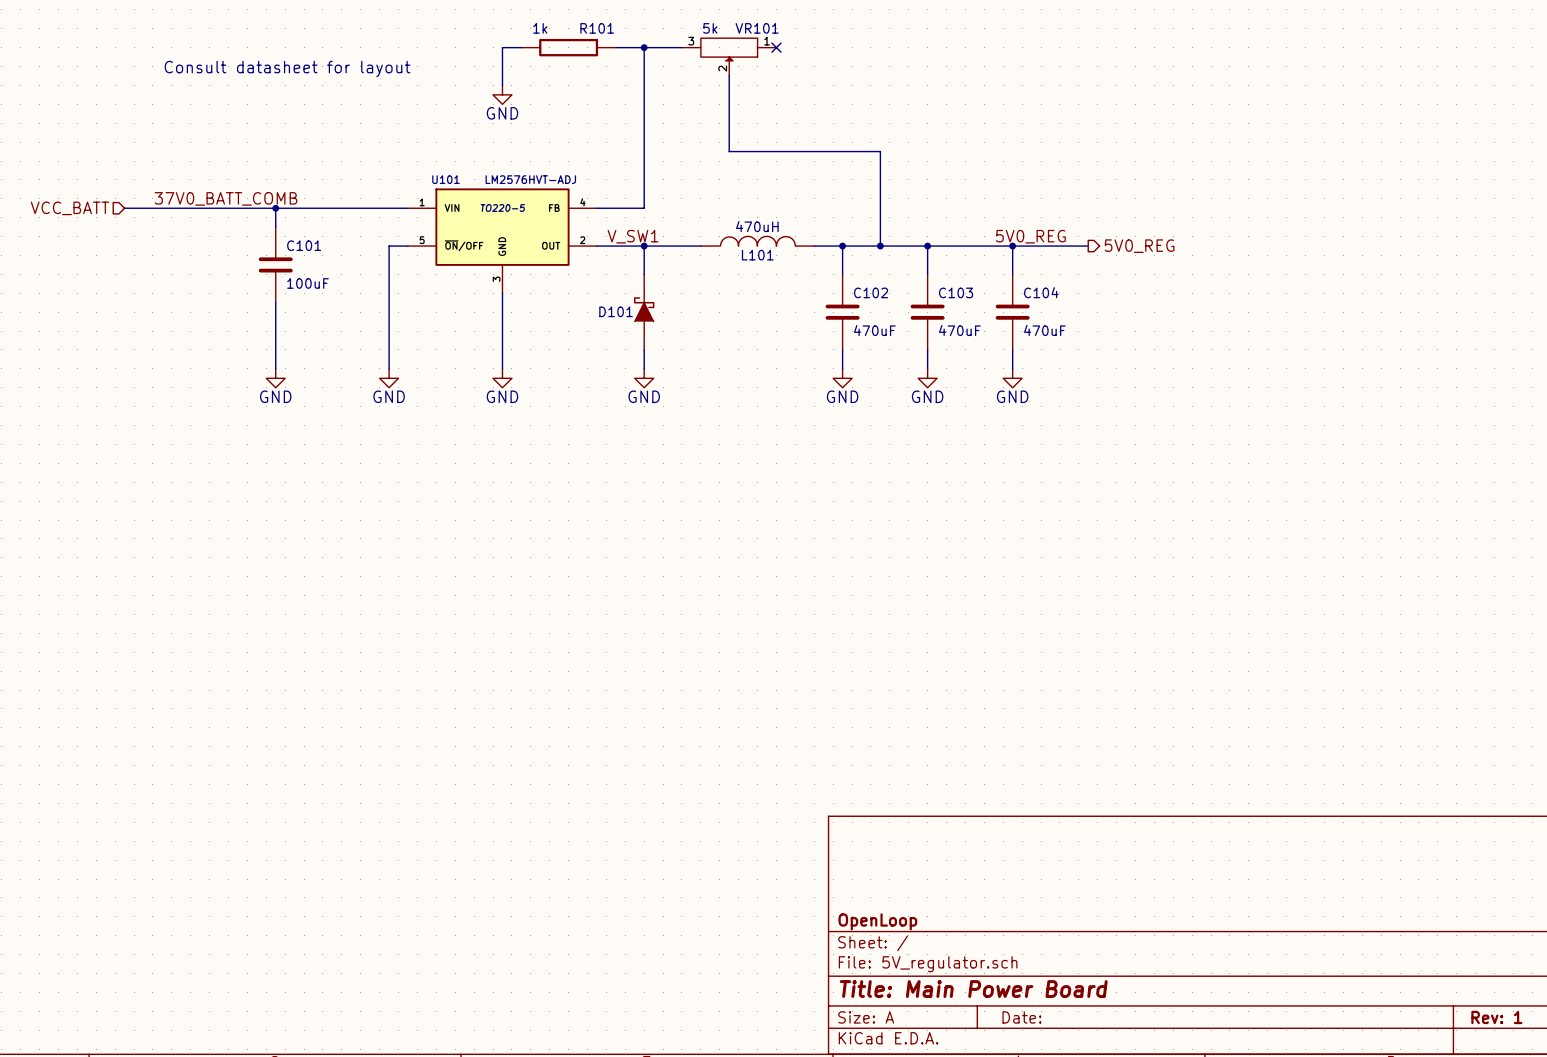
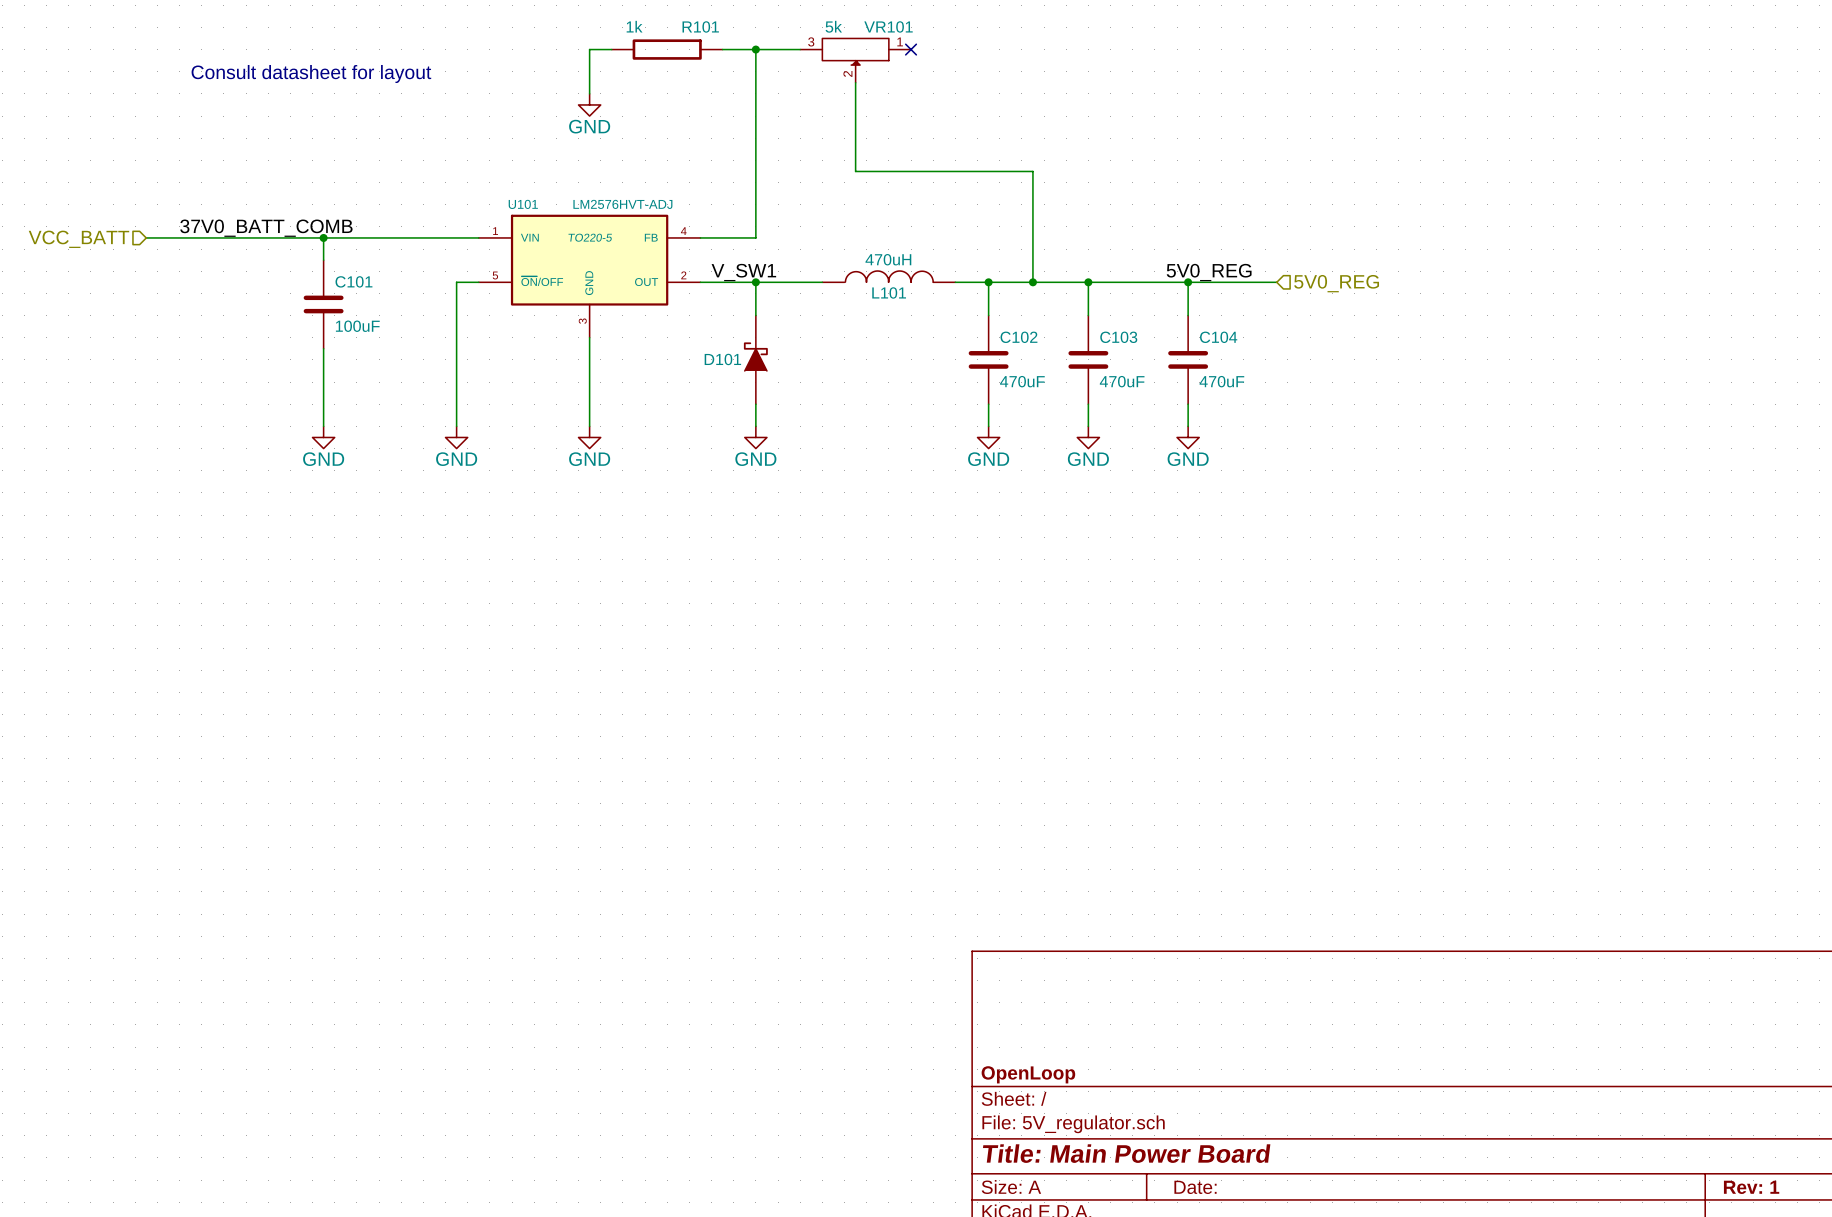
hierarchical label shape: output (1139, 246) -> input (1336, 283)

